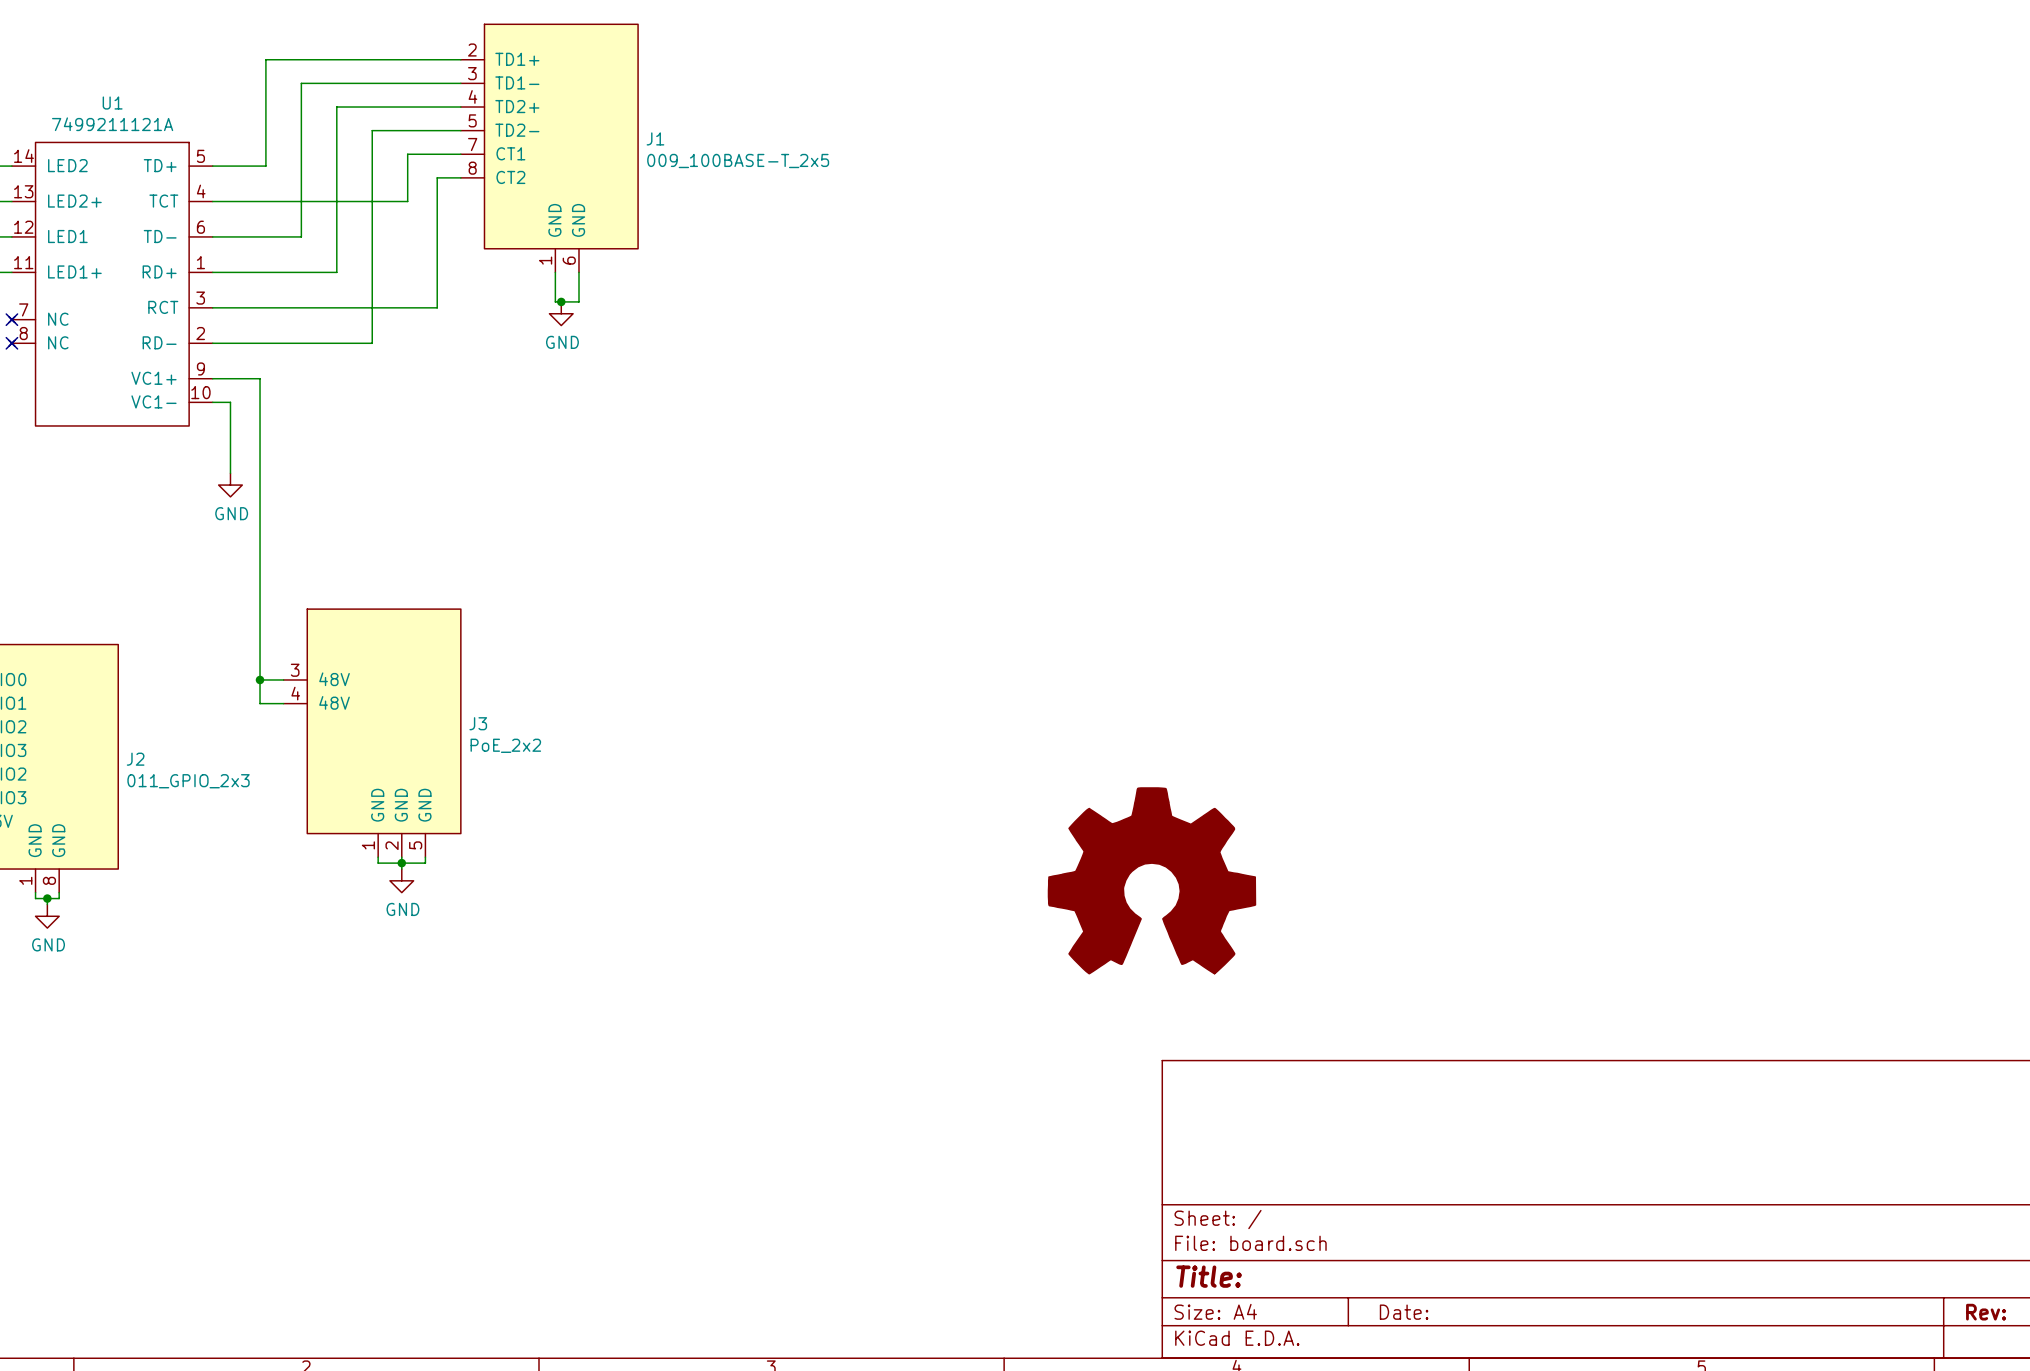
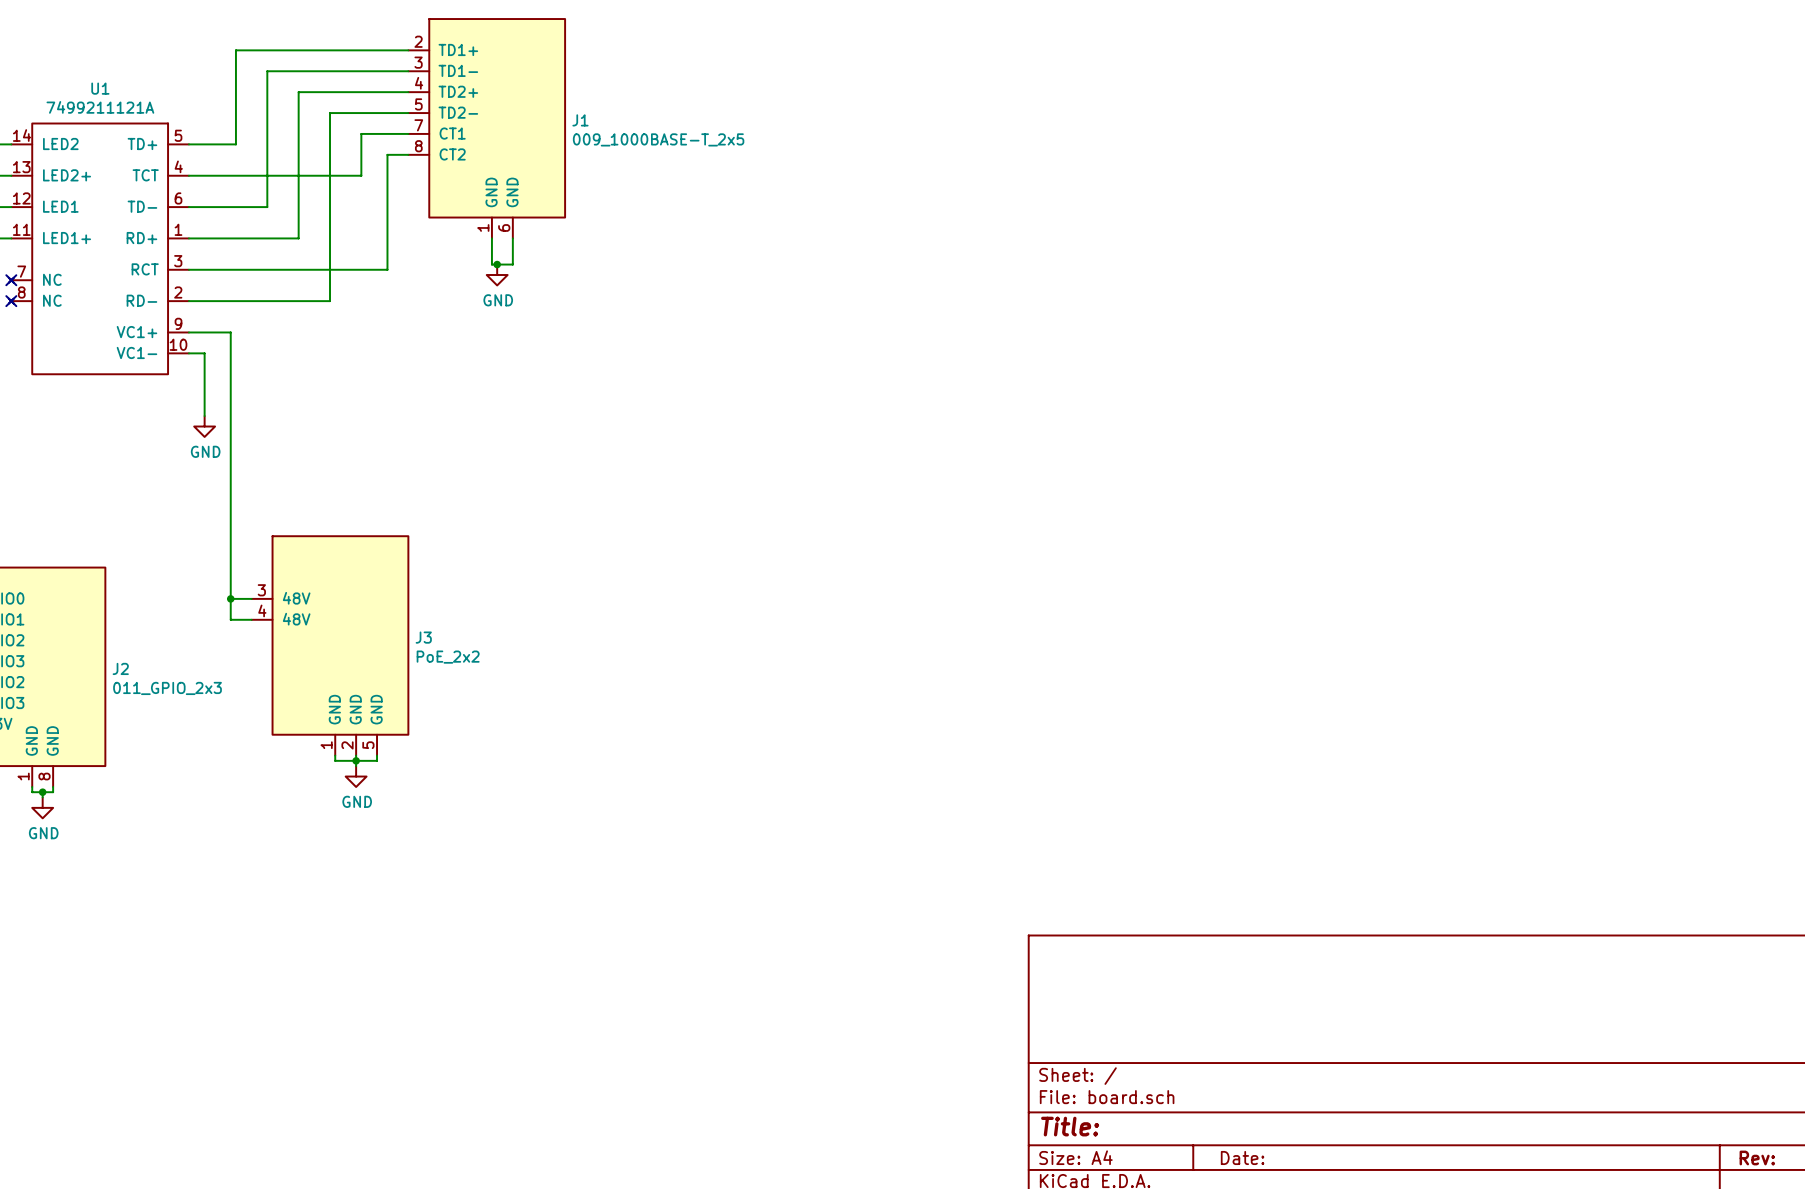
J1 value: 009_100BASE-T_2x5 (738, 161) -> 009_1000BASE-T_2x5 (658, 139)
part: (1151, 880) -> none

